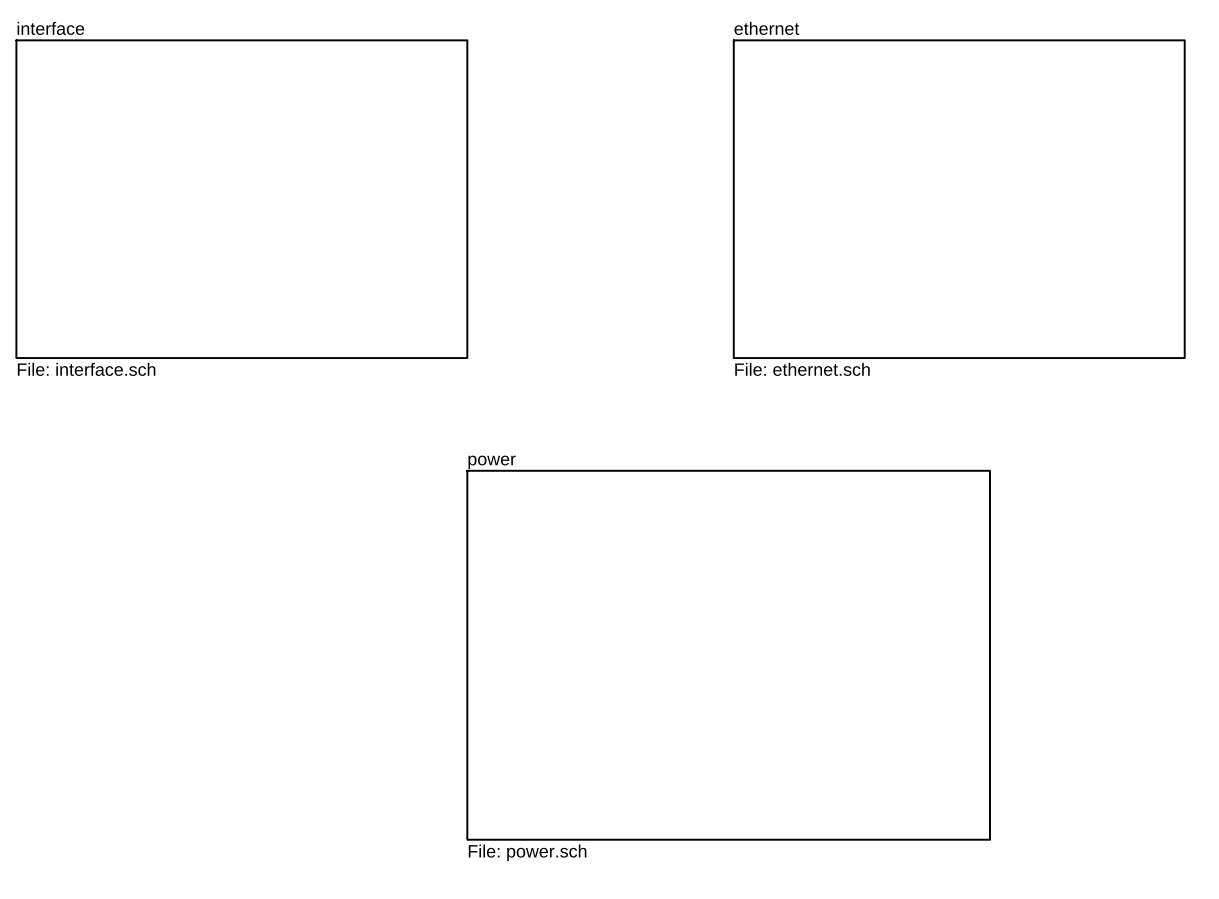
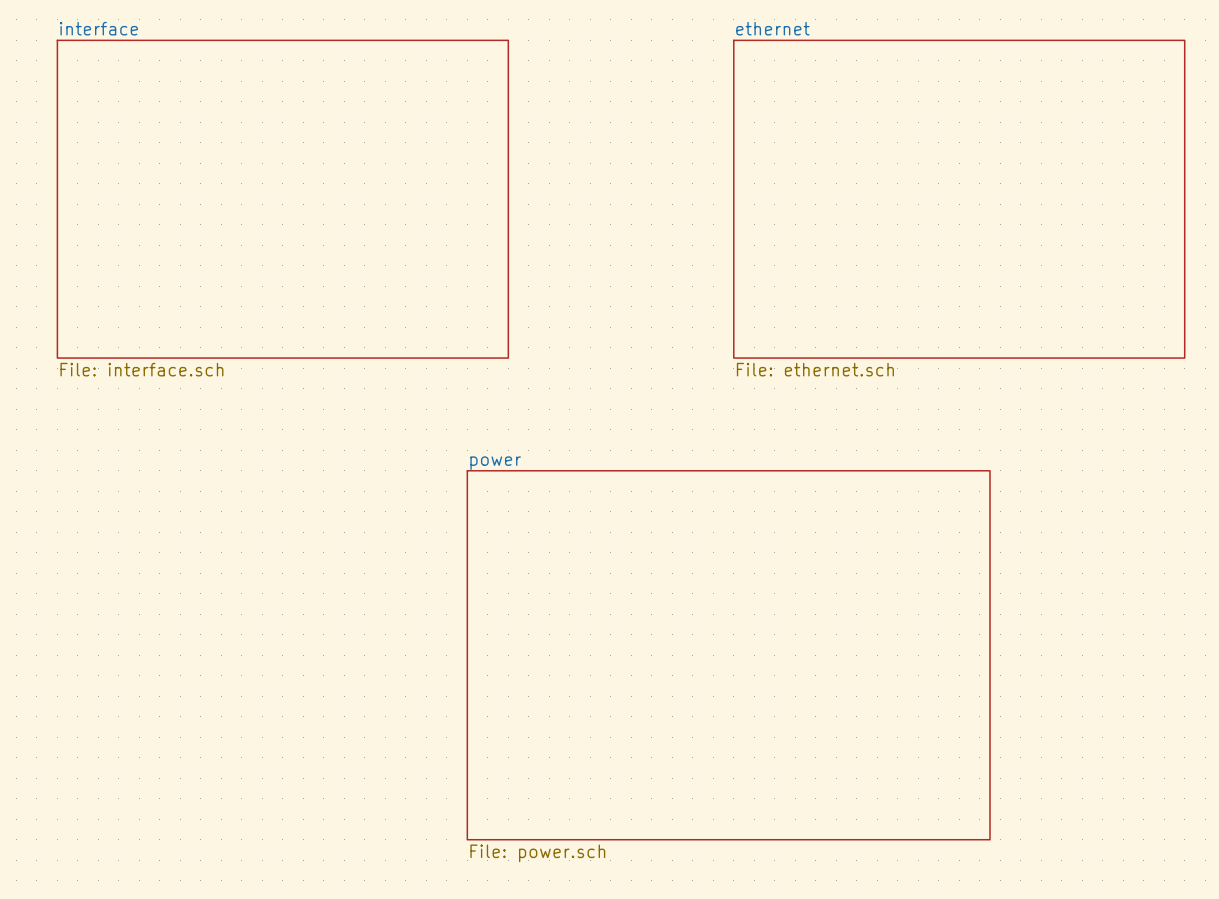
sheet interface position: (241, 199) -> (282, 199)

